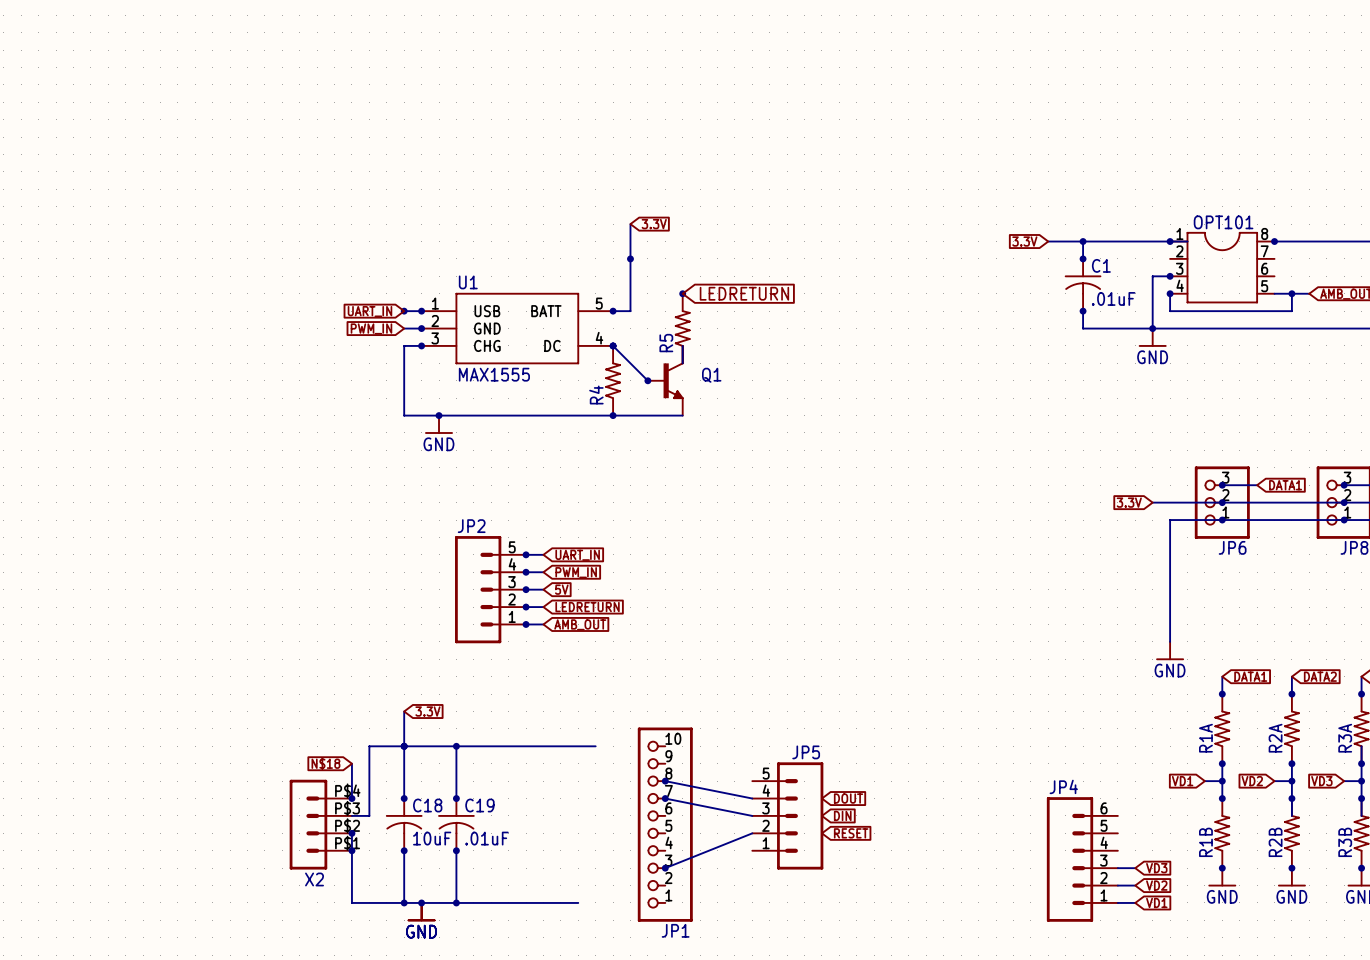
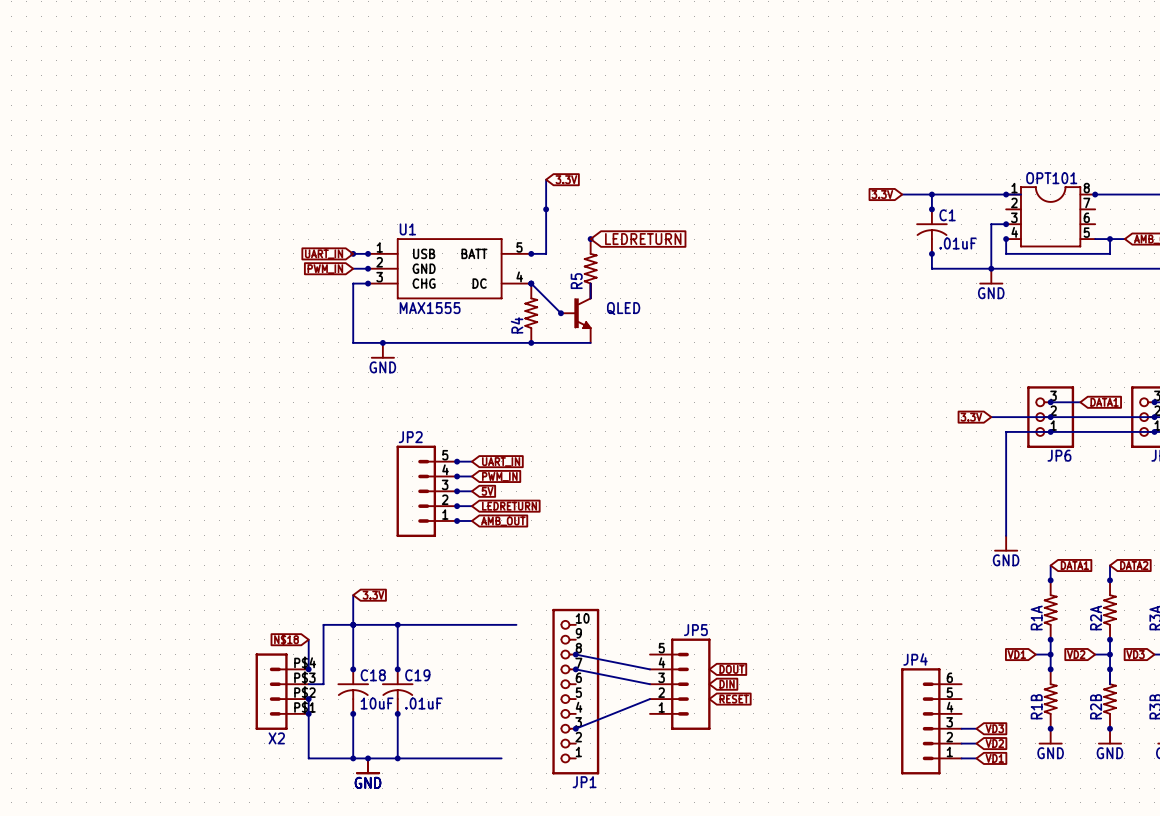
Q1 name: Q1 (711, 375) -> QLED (623, 308)

